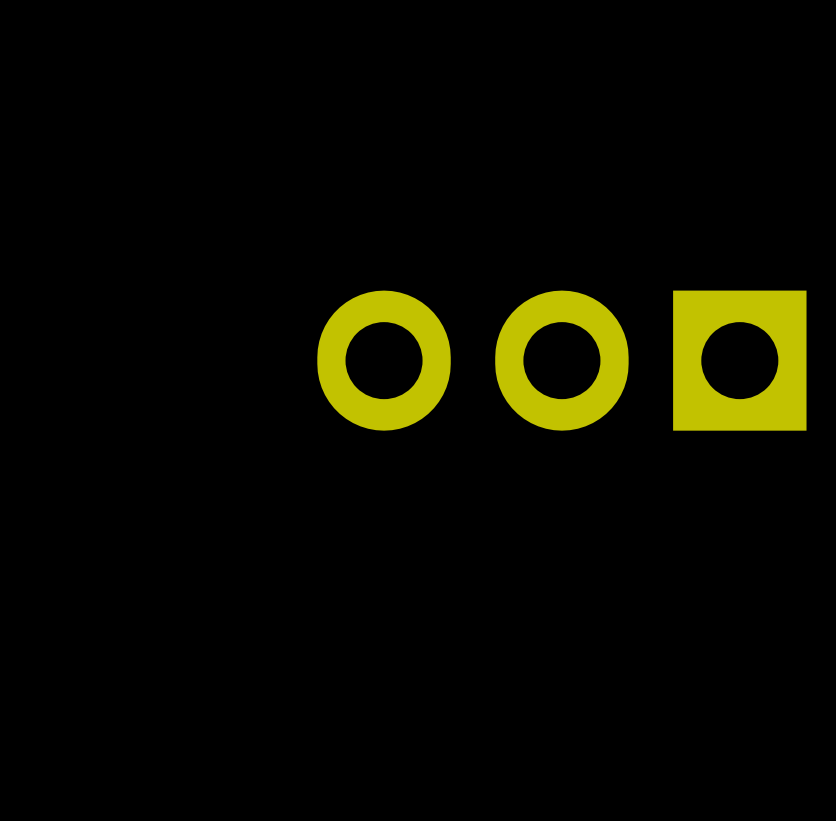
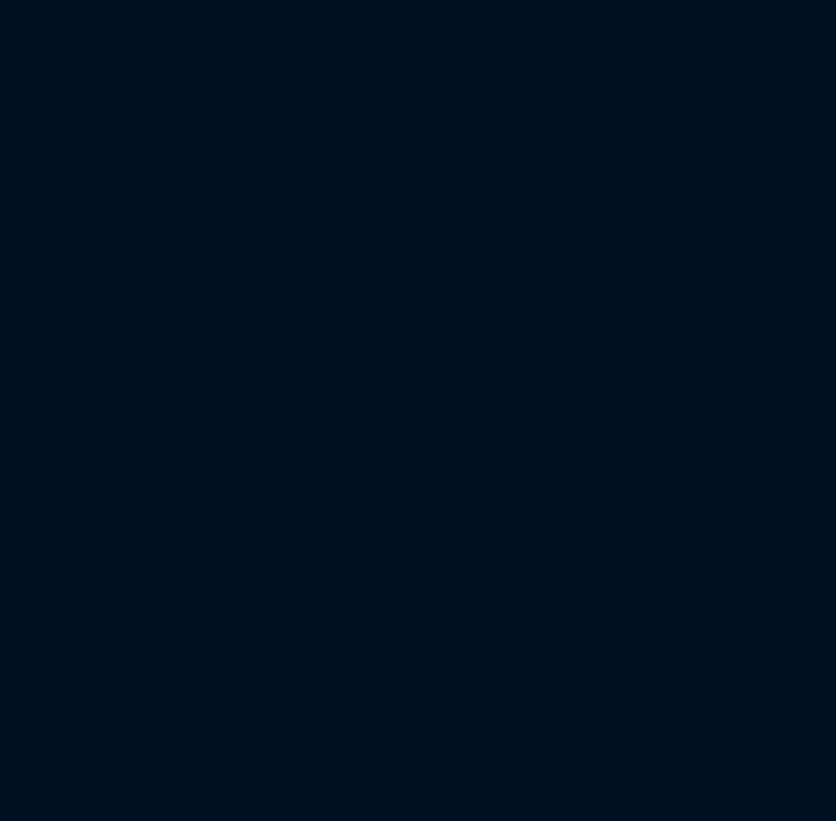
part: (561, 360) -> none

